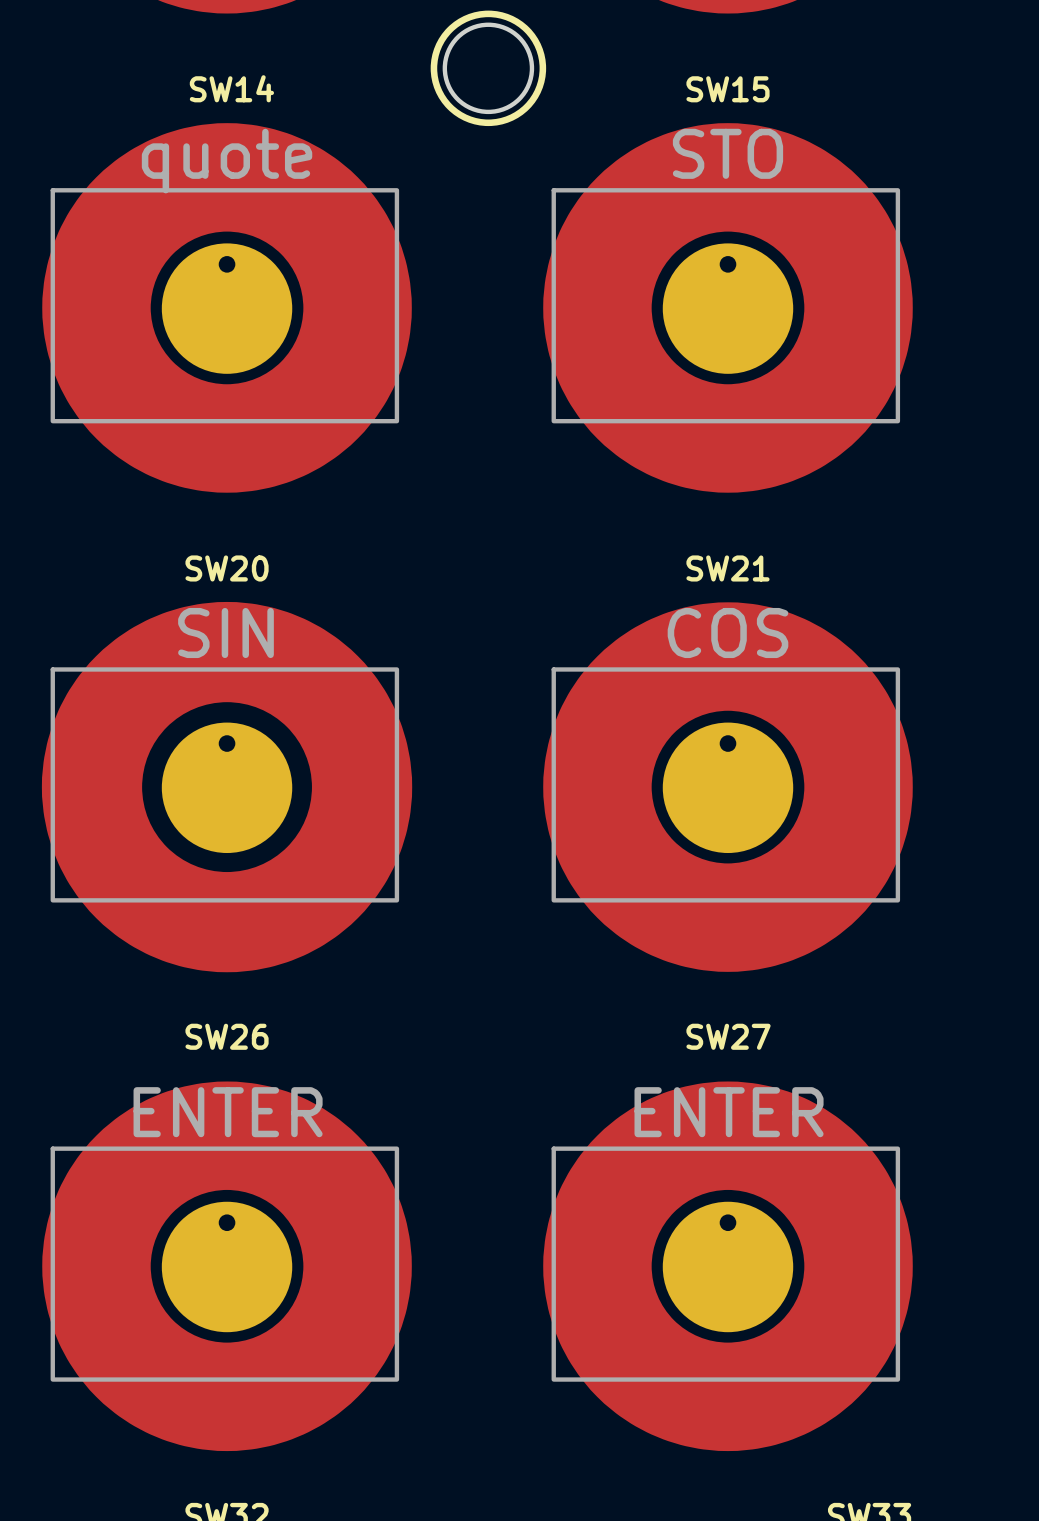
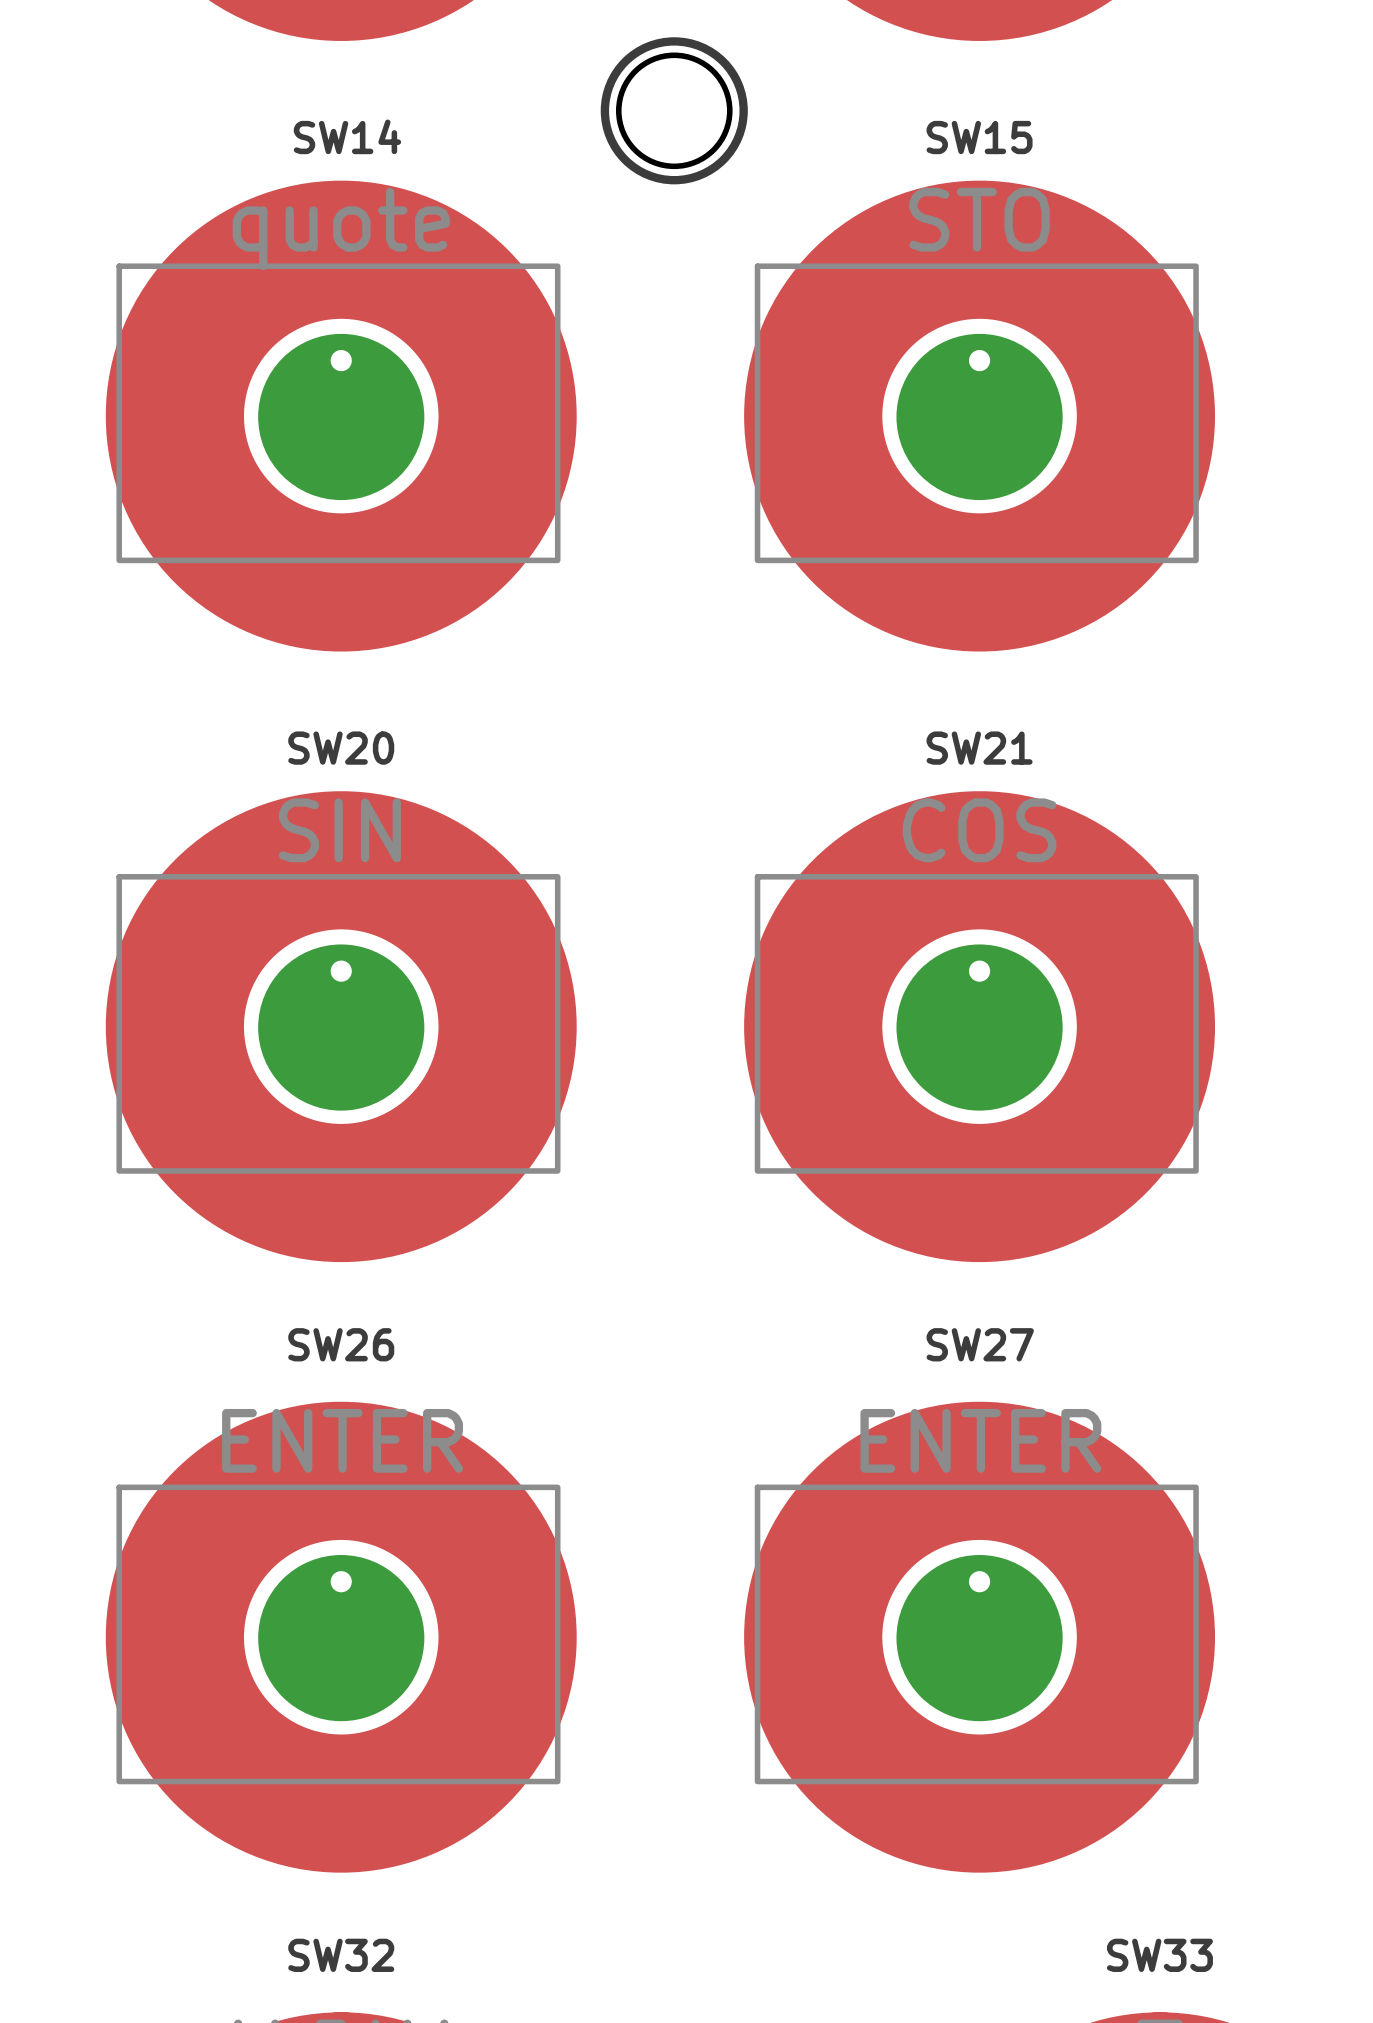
SW20 footprint: [41, 601, 413, 973] -> [105, 791, 577, 1263]

